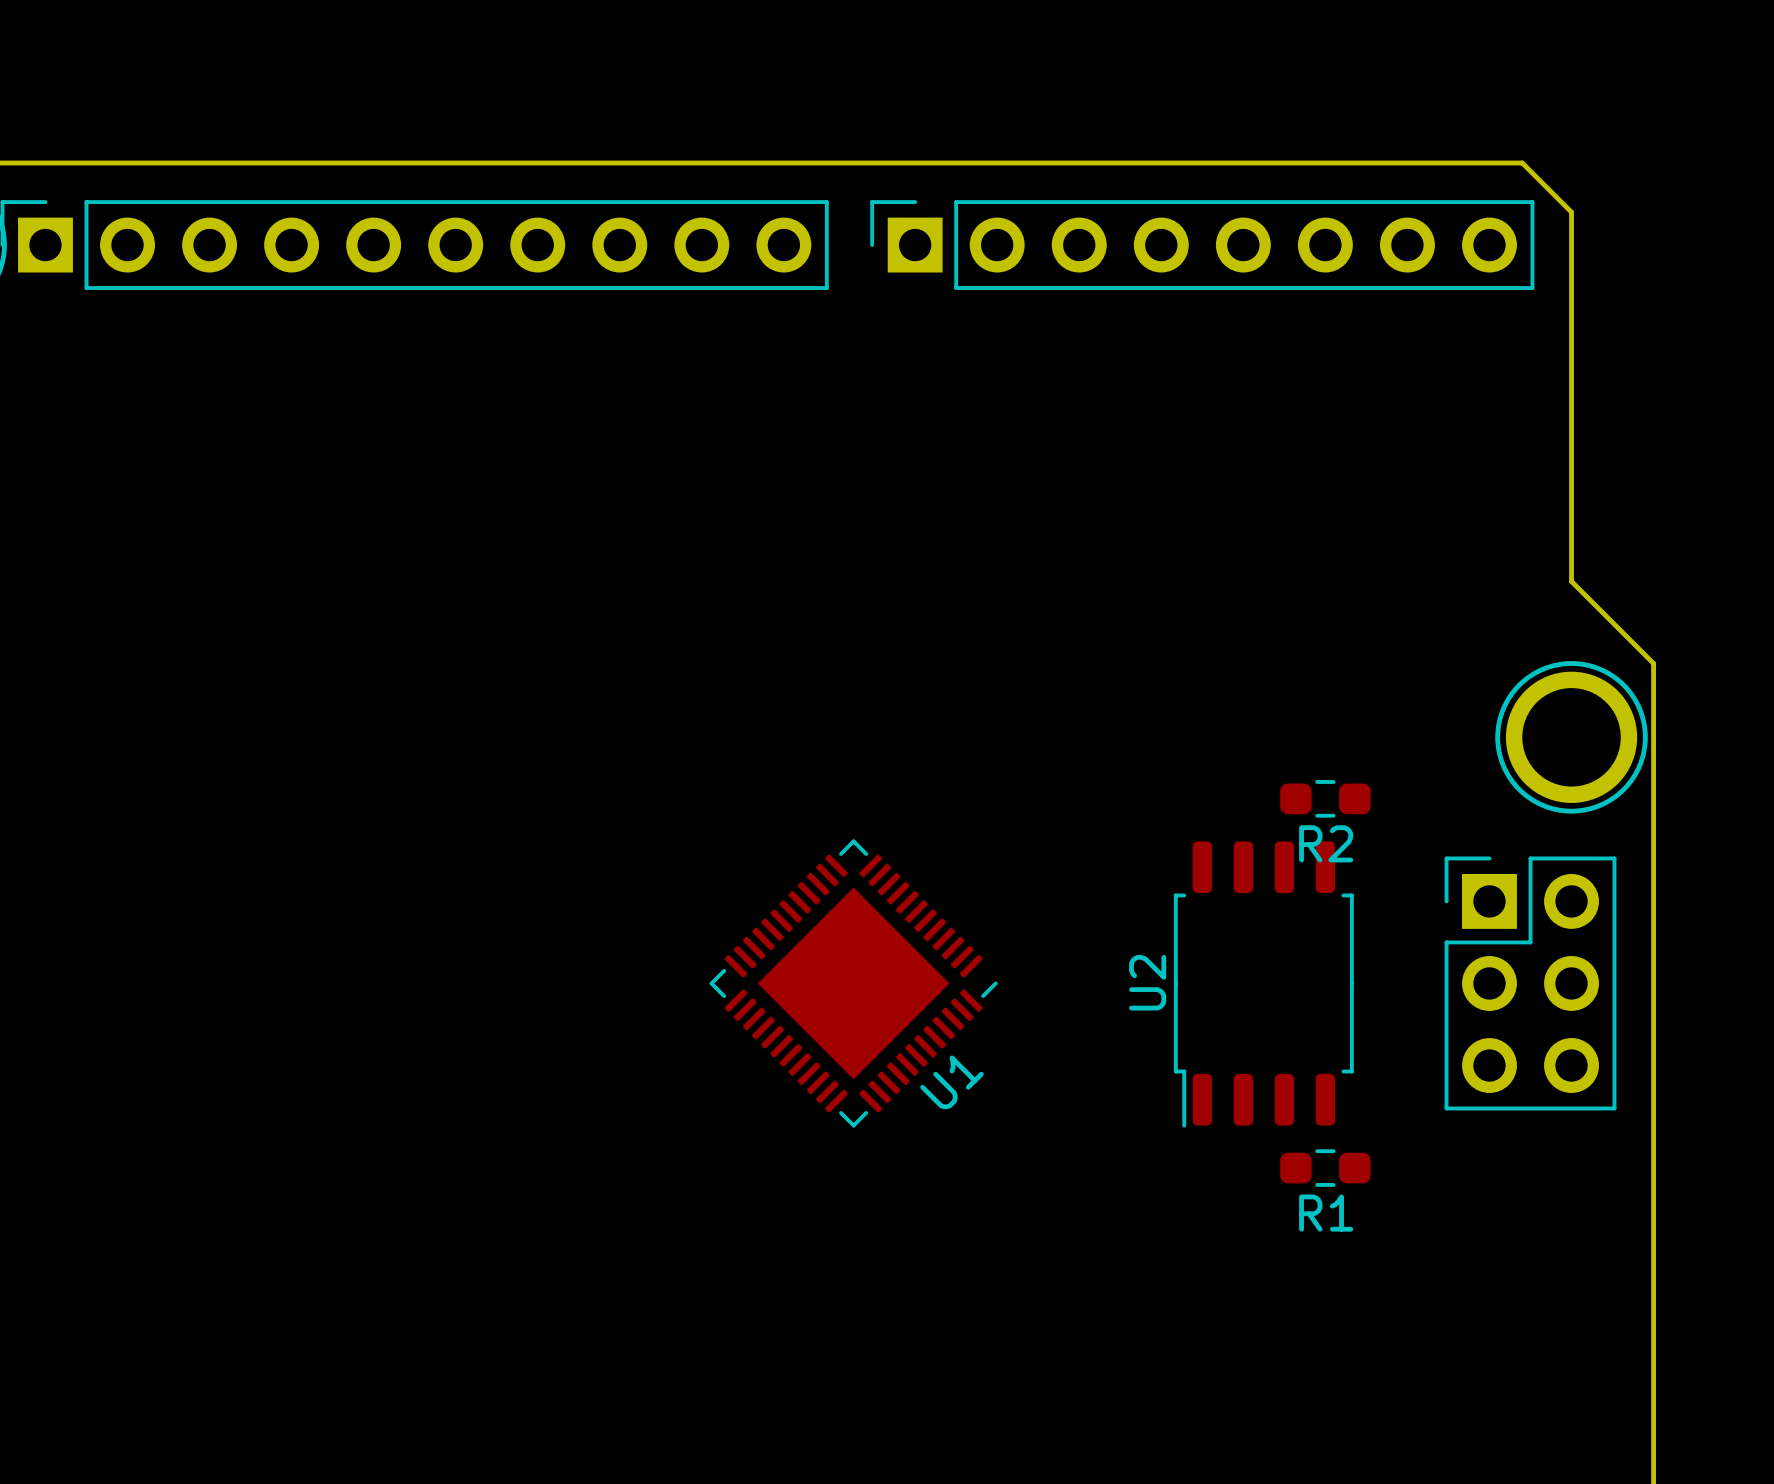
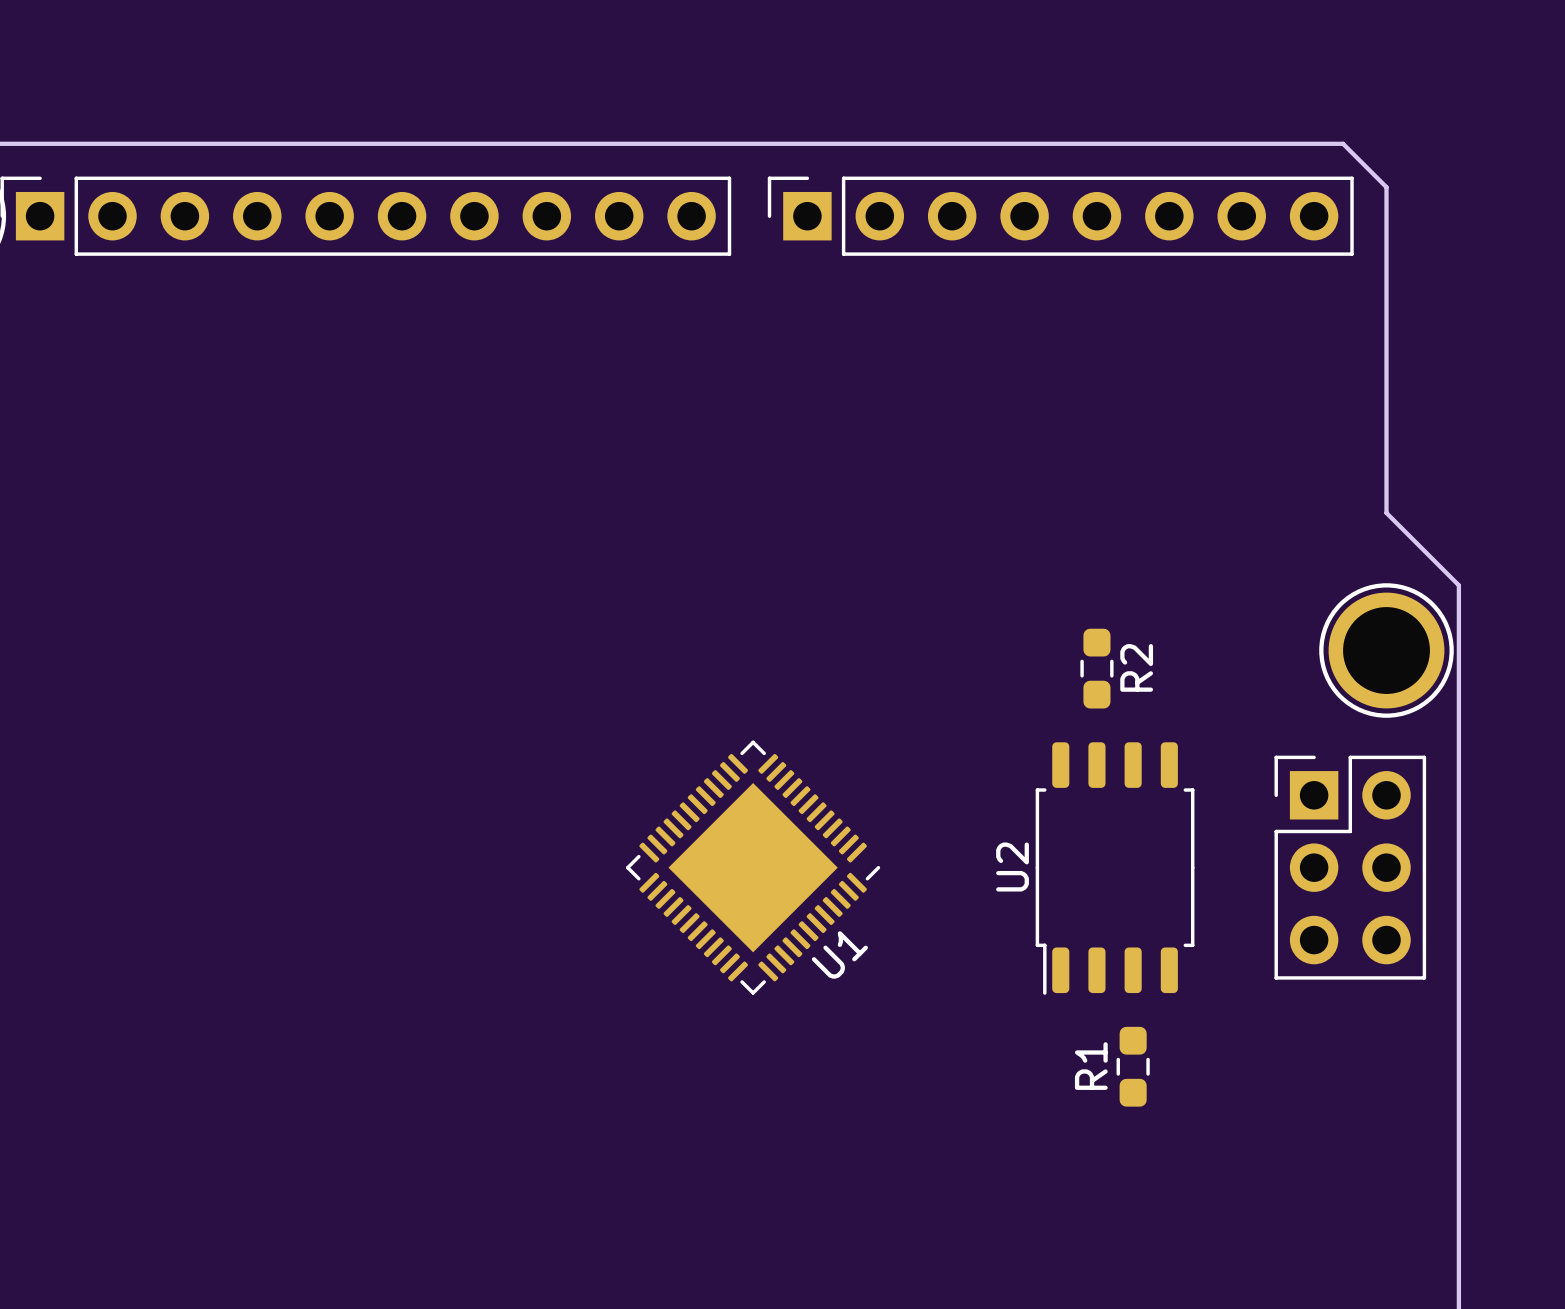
R2 rotation: 0° (1325, 798) -> 90° clockwise (1096, 668)
R2 position: (1325, 798) -> (1096, 668)
R2 name position: R2 (1326, 843) -> R2 (1136, 667)
R1 rotation: 0° (1325, 1168) -> 90° clockwise (1133, 1066)
R1 position: (1325, 1168) -> (1133, 1066)

